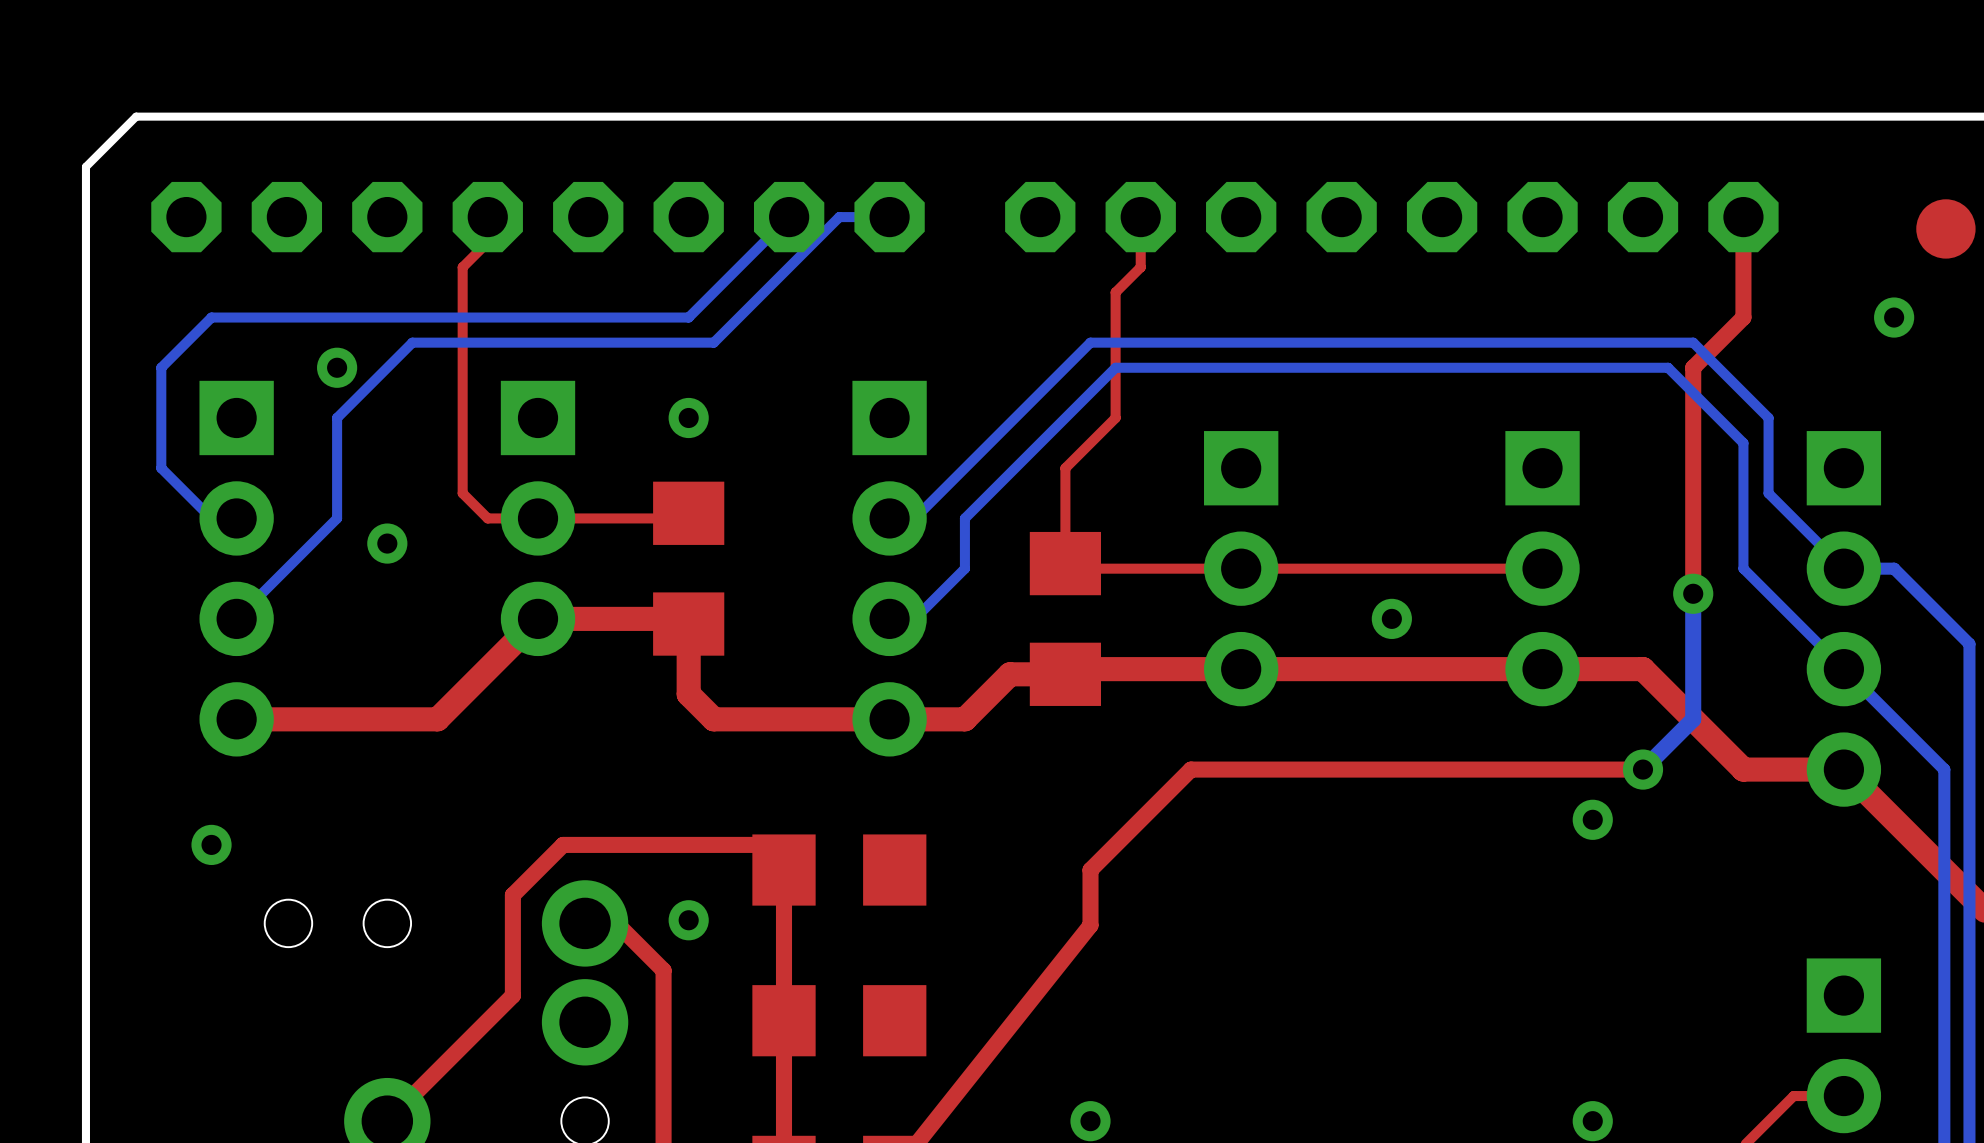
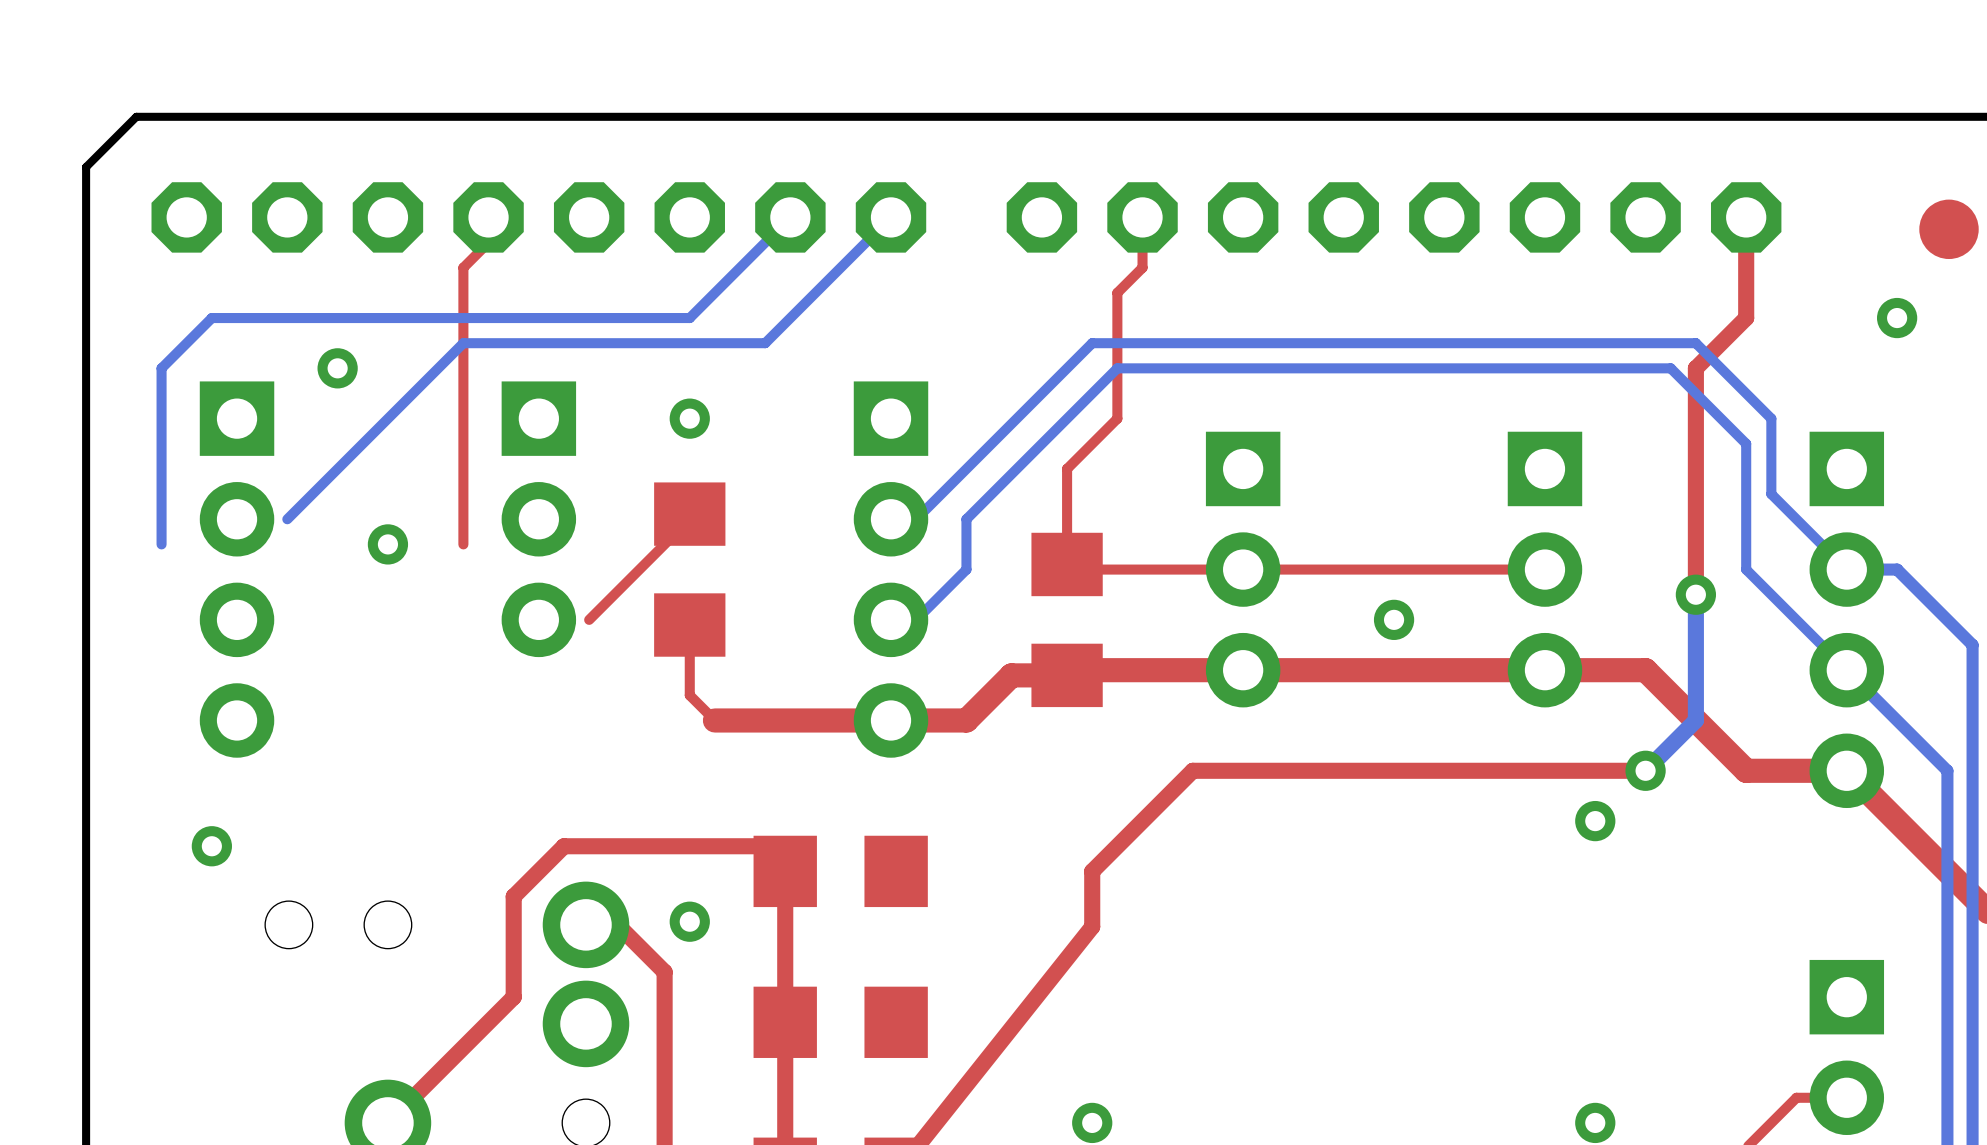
bottom track: (889, 217) (839, 217) (713, 342) -> (890, 217) (765, 343) (714, 343)
bottom track: (462, 342) (412, 342) (337, 417) (337, 518) (236, 618) -> (463, 343) (287, 519)
bottom track: (161, 468) (211, 518) (236, 518) -> (161, 468) (161, 544)
top track: (462, 493) (487, 518) (688, 518) -> (589, 619) (689, 519)
top track: none -> (463, 494) (463, 544)
top track: (658, 624) (688, 624) (683, 618) (538, 618) (437, 719) (236, 719) -> none
top track width: thick (688, 624) (688, 694) (713, 719) -> thin (689, 625) (689, 695) (714, 720)

